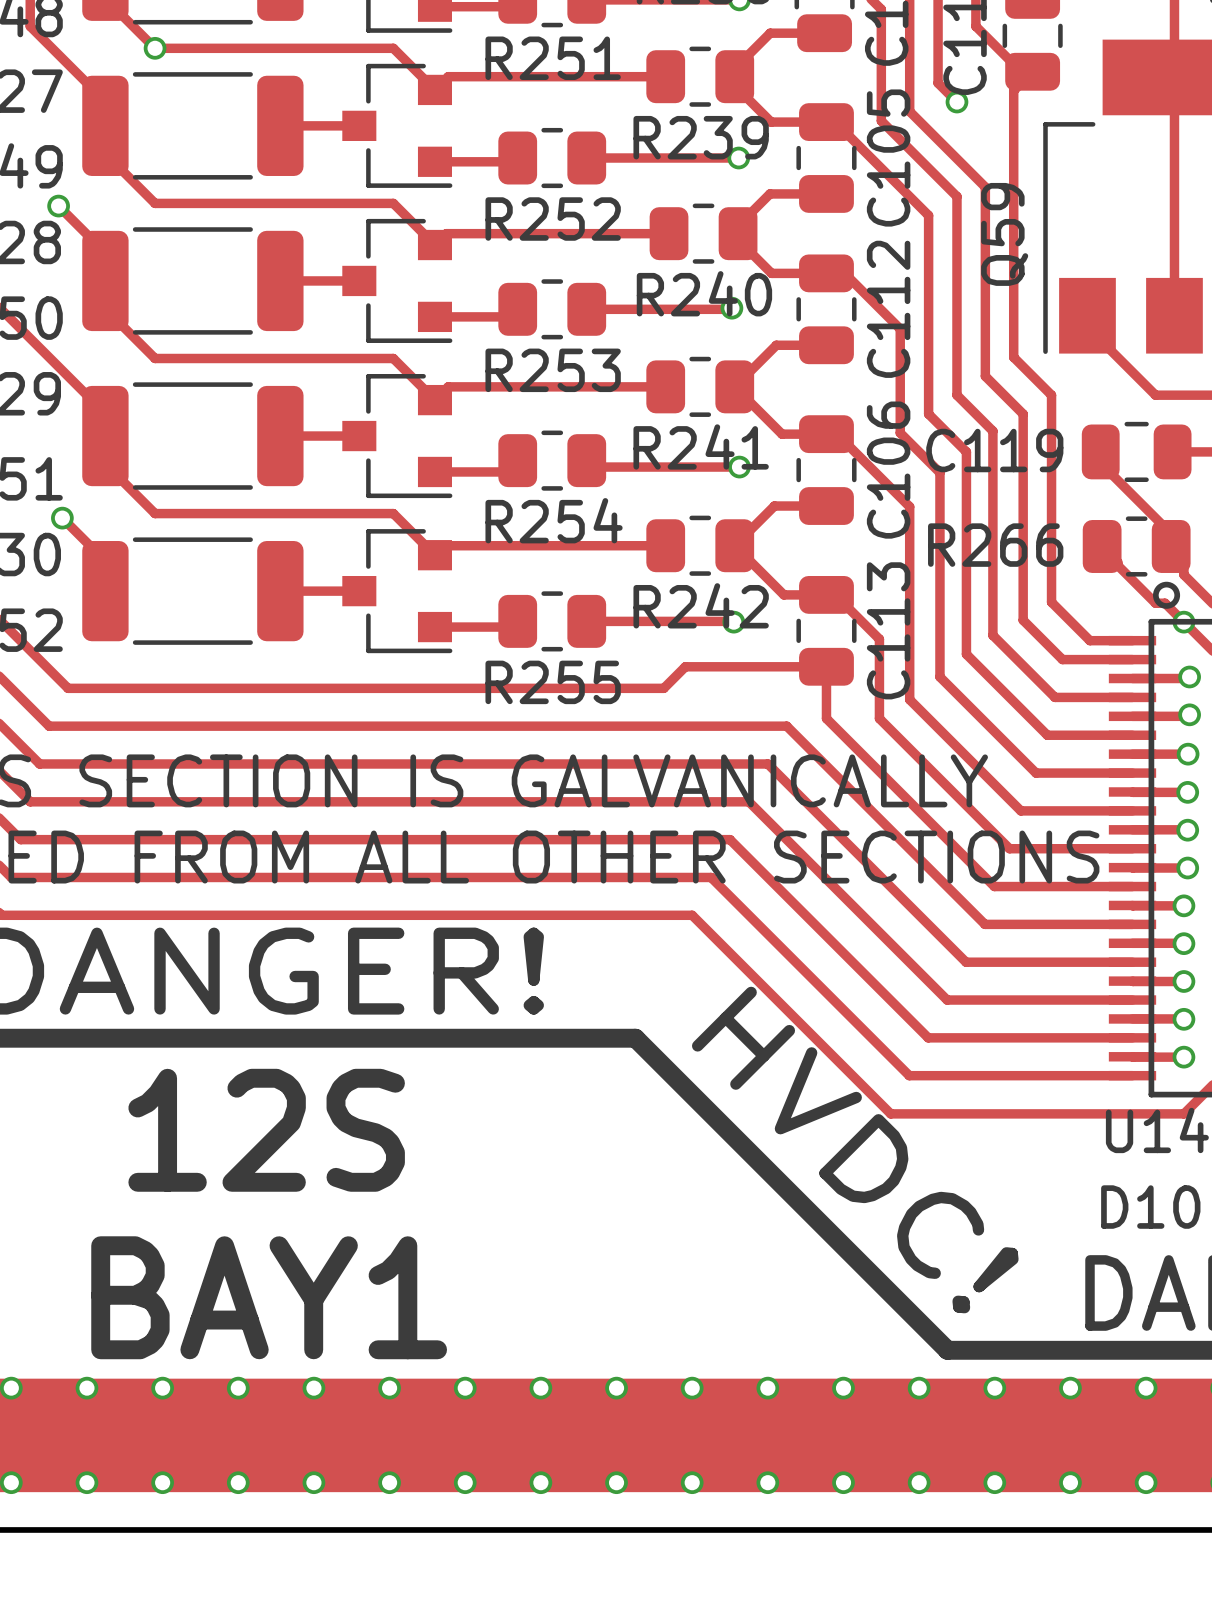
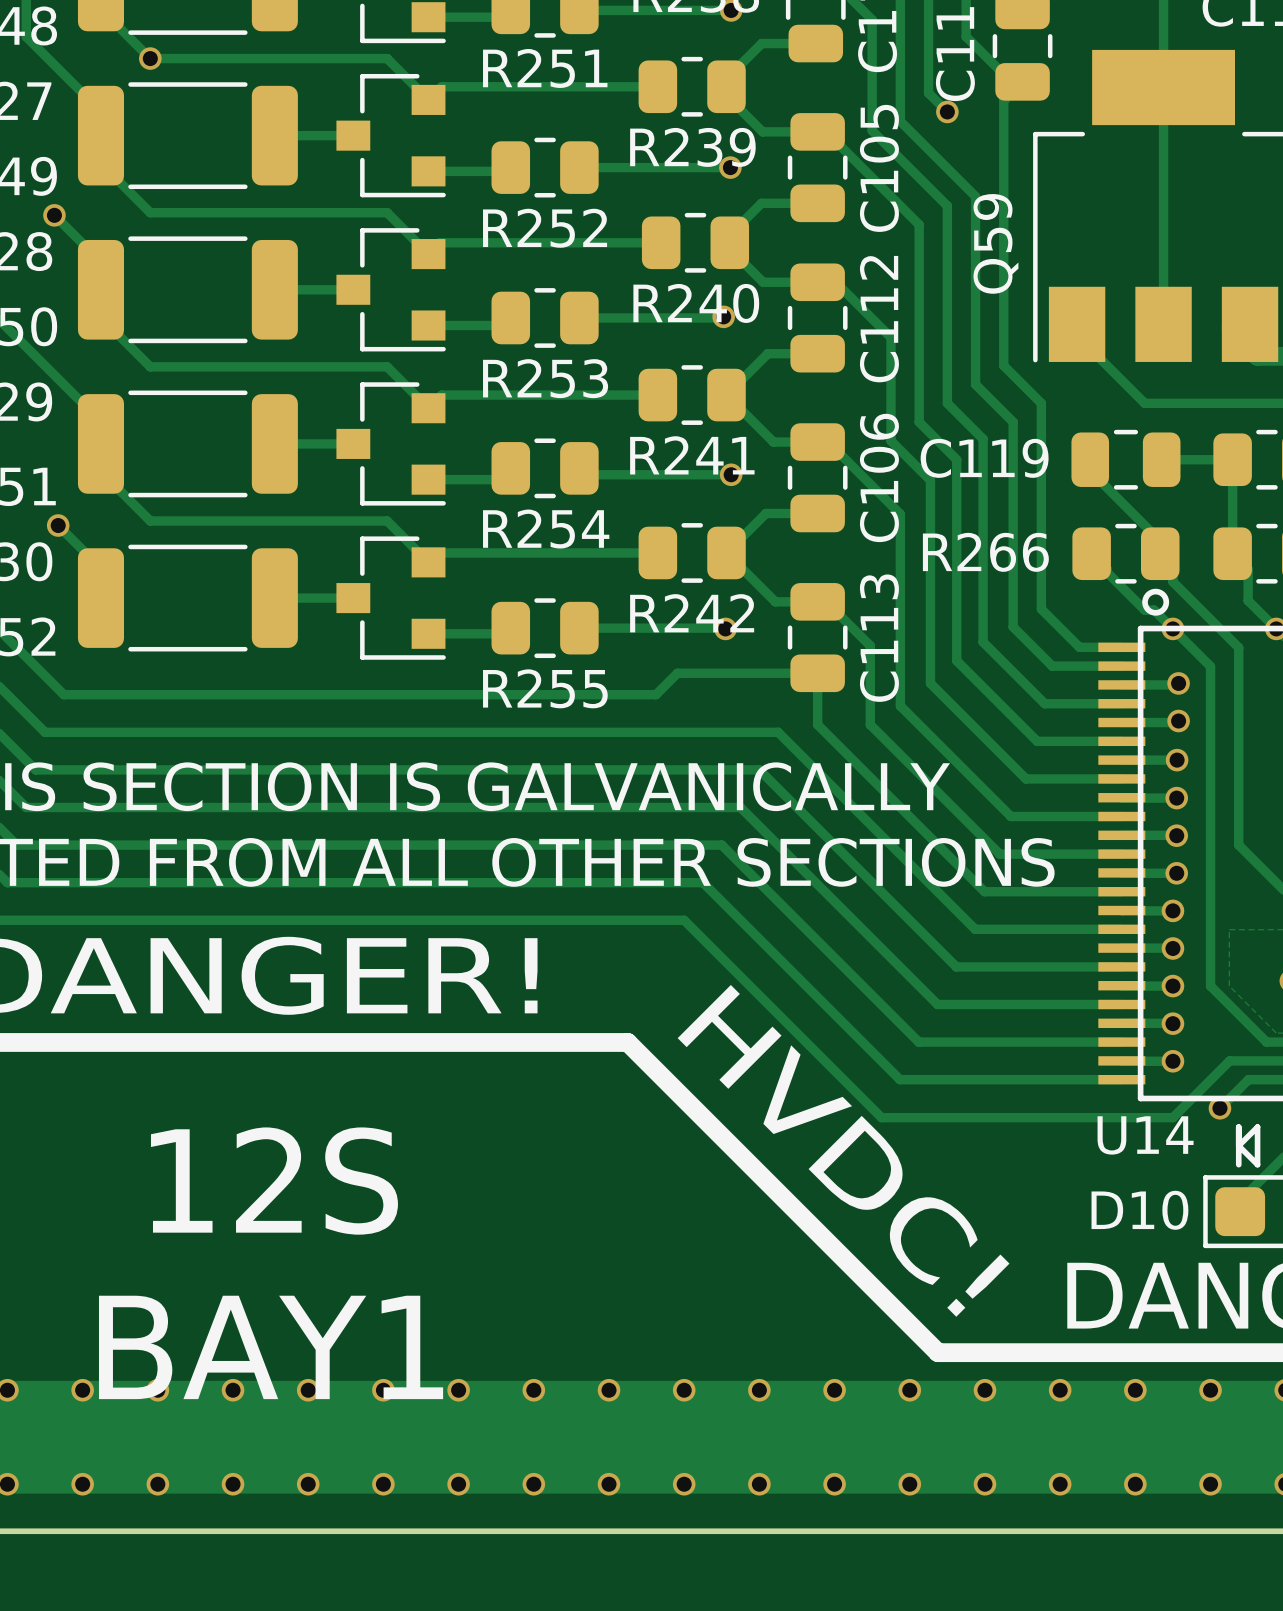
text position: 12S (266, 1130) -> 12S (274, 1181)
text position: BAY1 (269, 1297) -> BAY1 (271, 1347)

